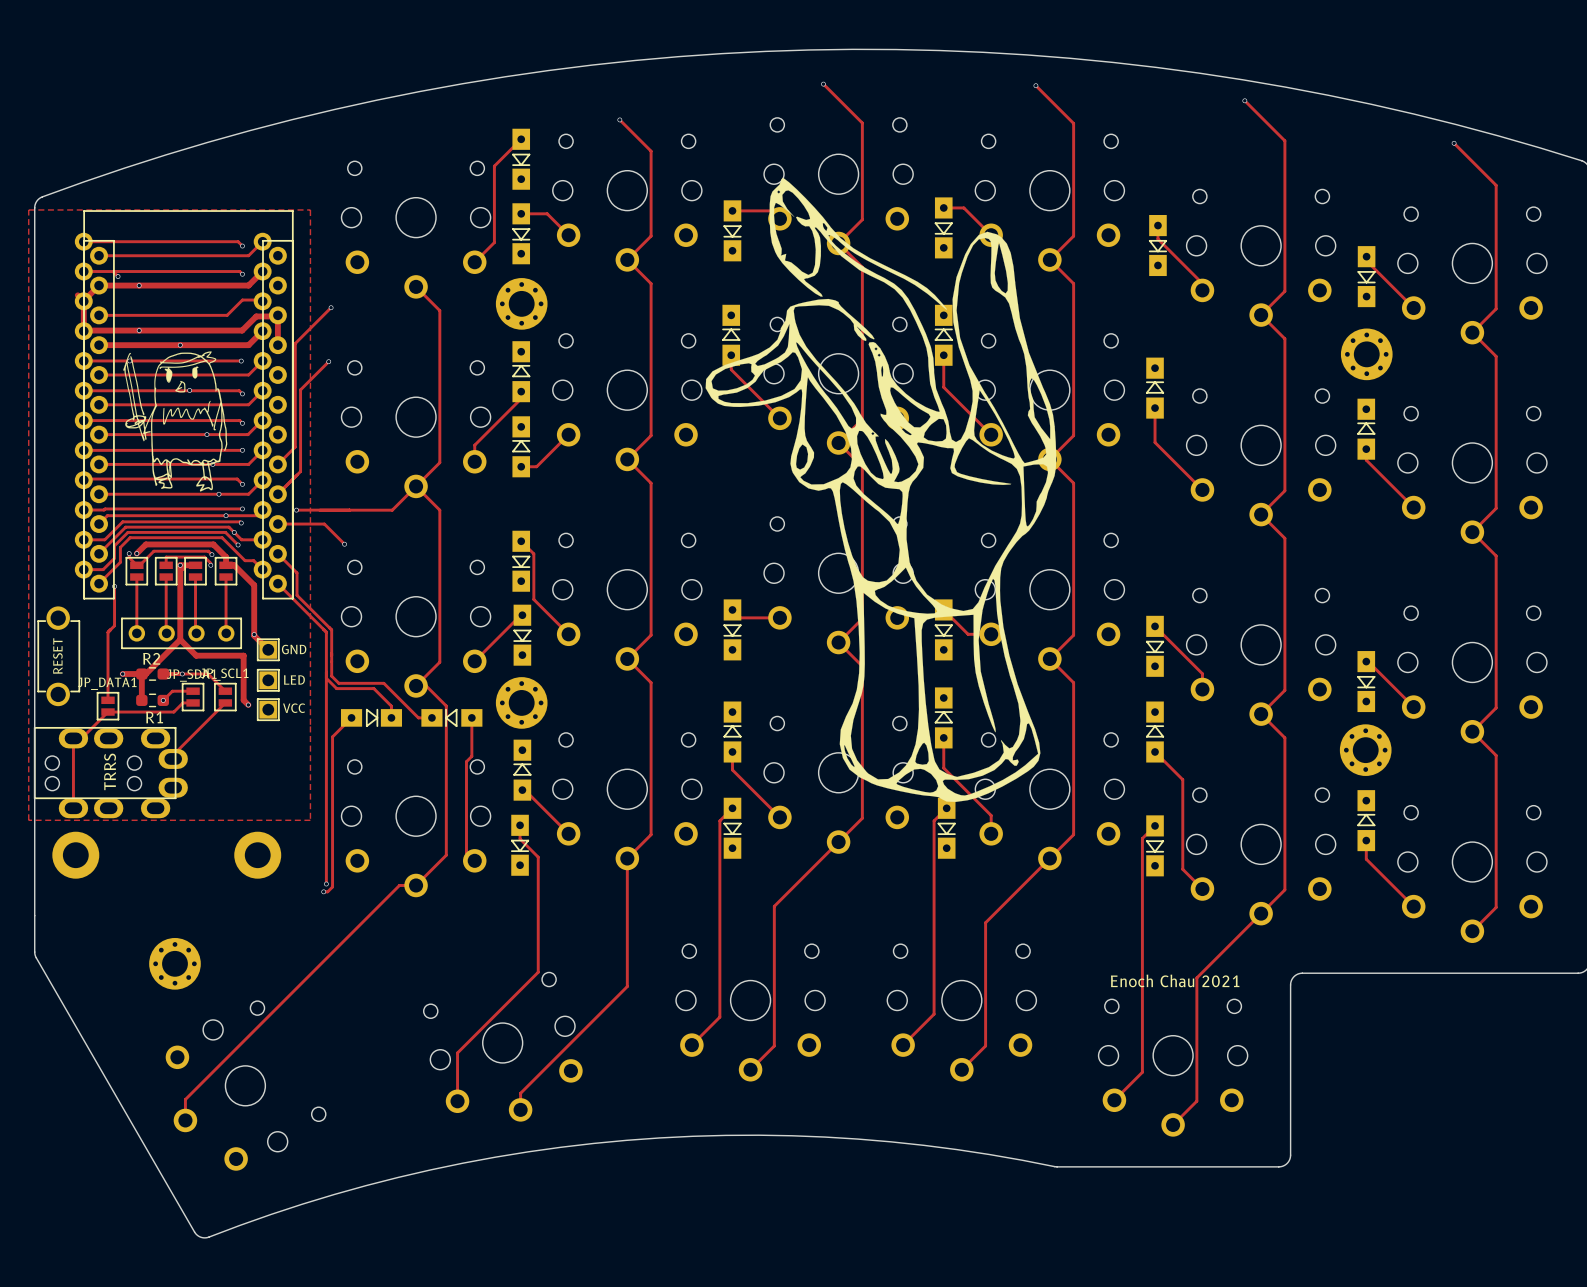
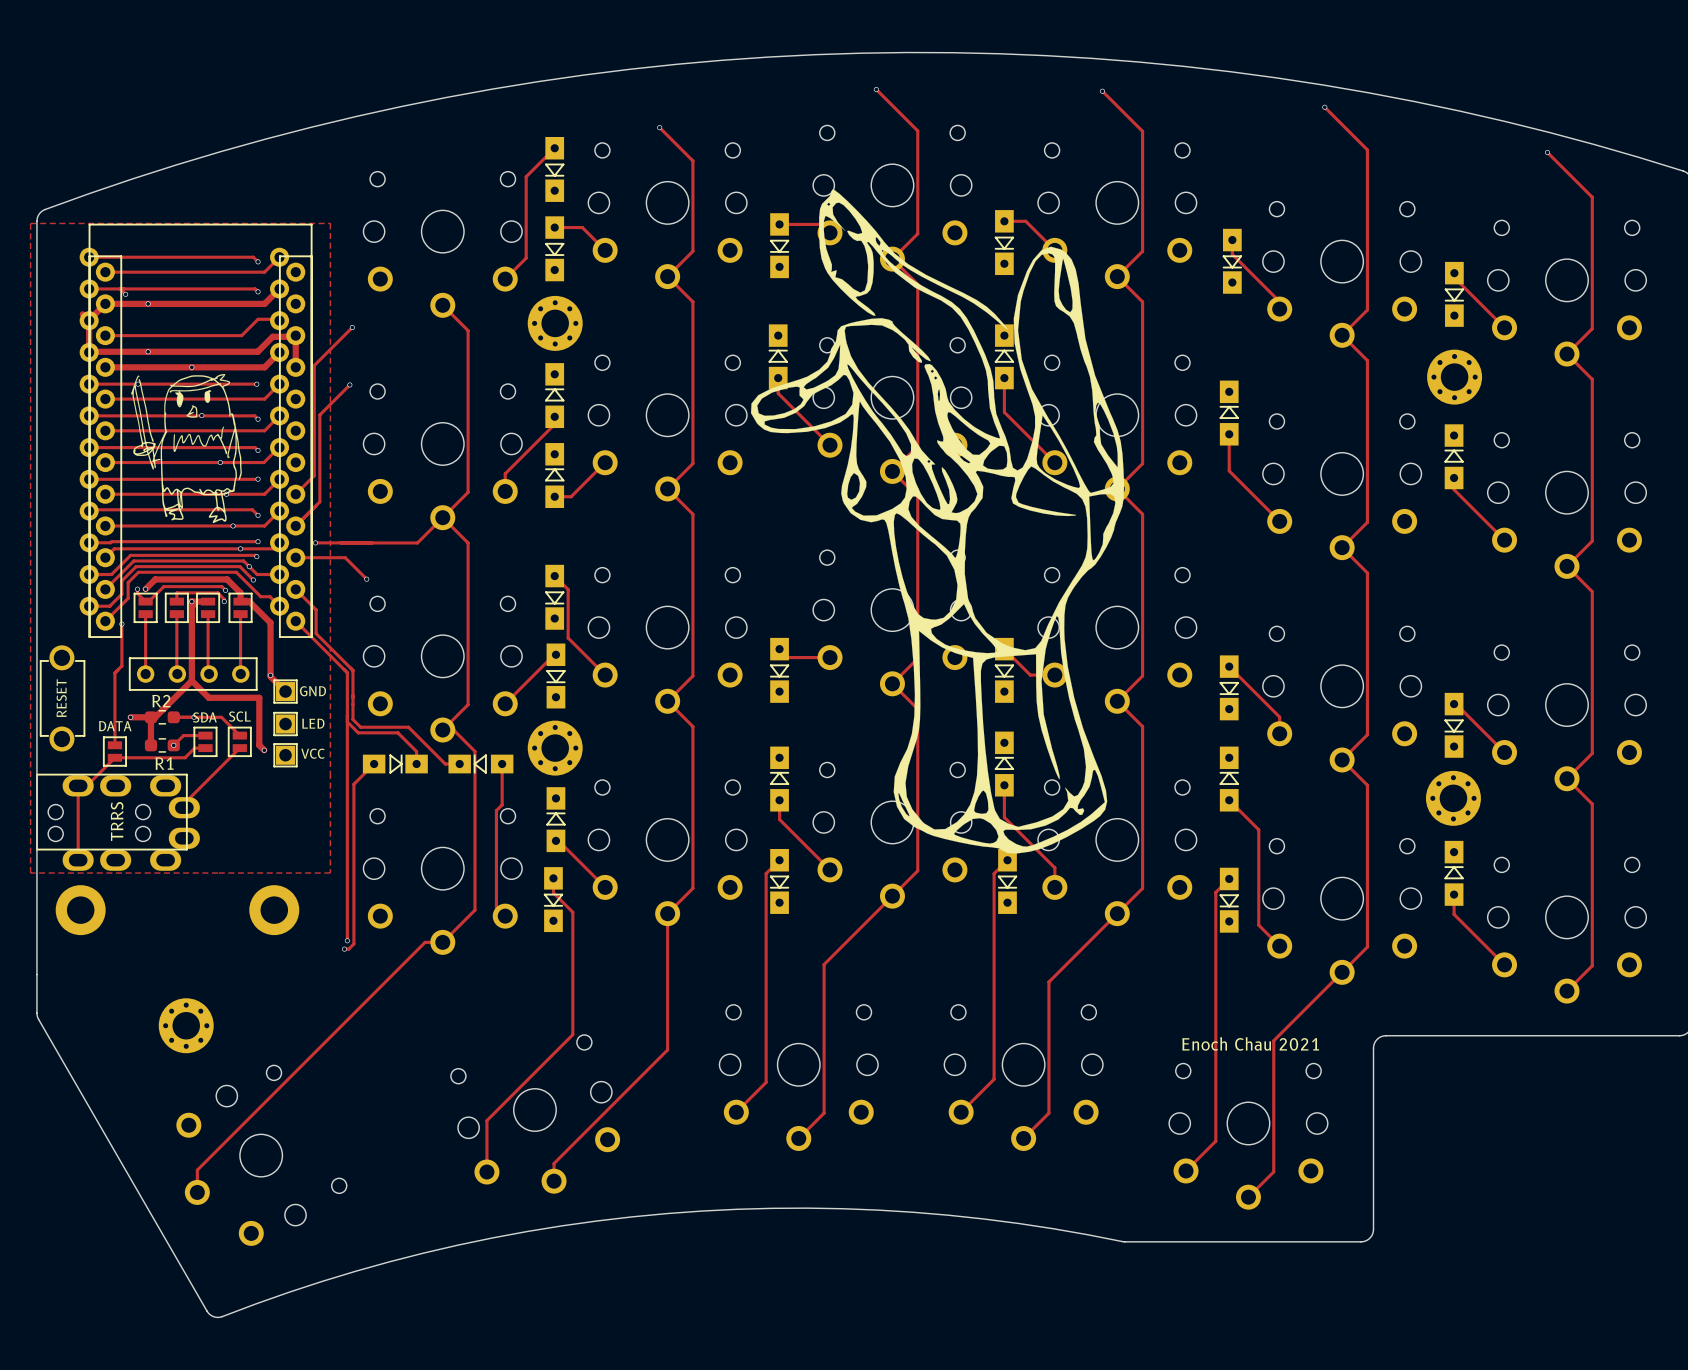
JP_SCL1 name: JP_SCL1 (224, 674) -> SCL (239, 716)
JP_SDA1 name: JP_SDA1 (191, 675) -> SDA (204, 717)
JP_DATA1 name: JP_DATA1 (107, 683) -> DATA (115, 726)

